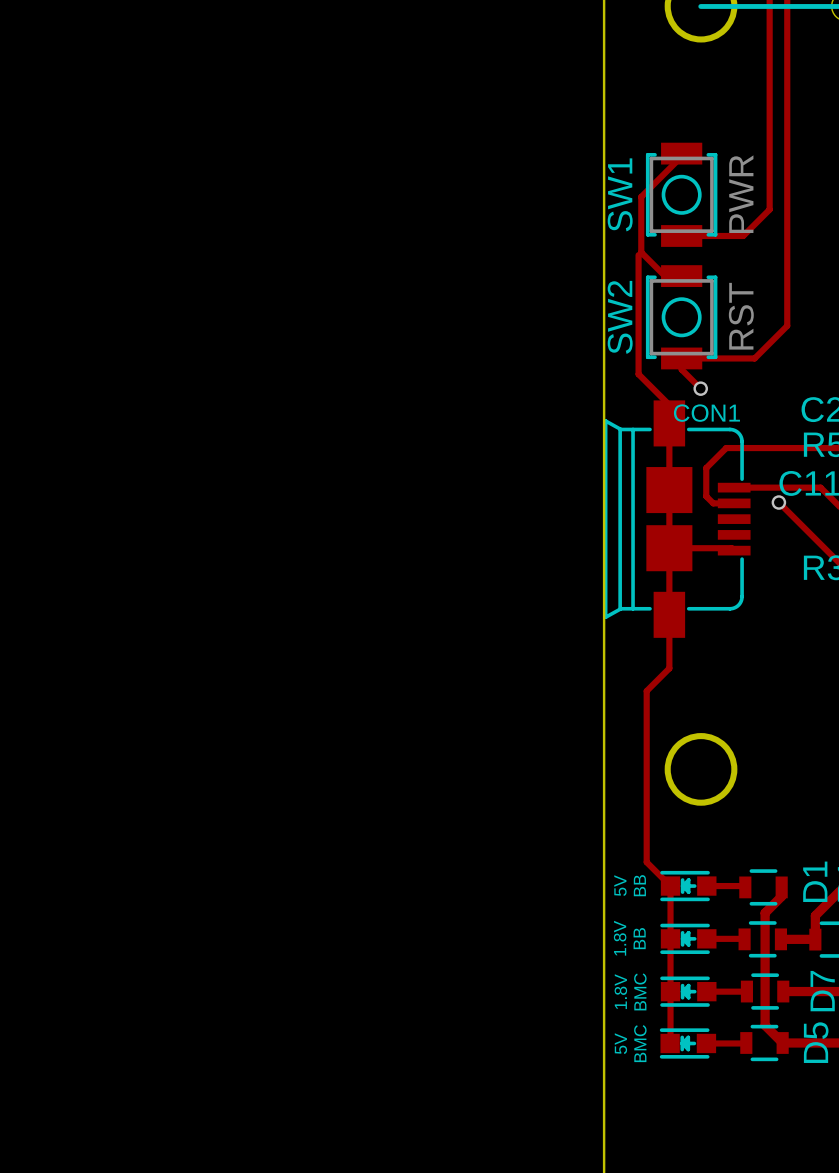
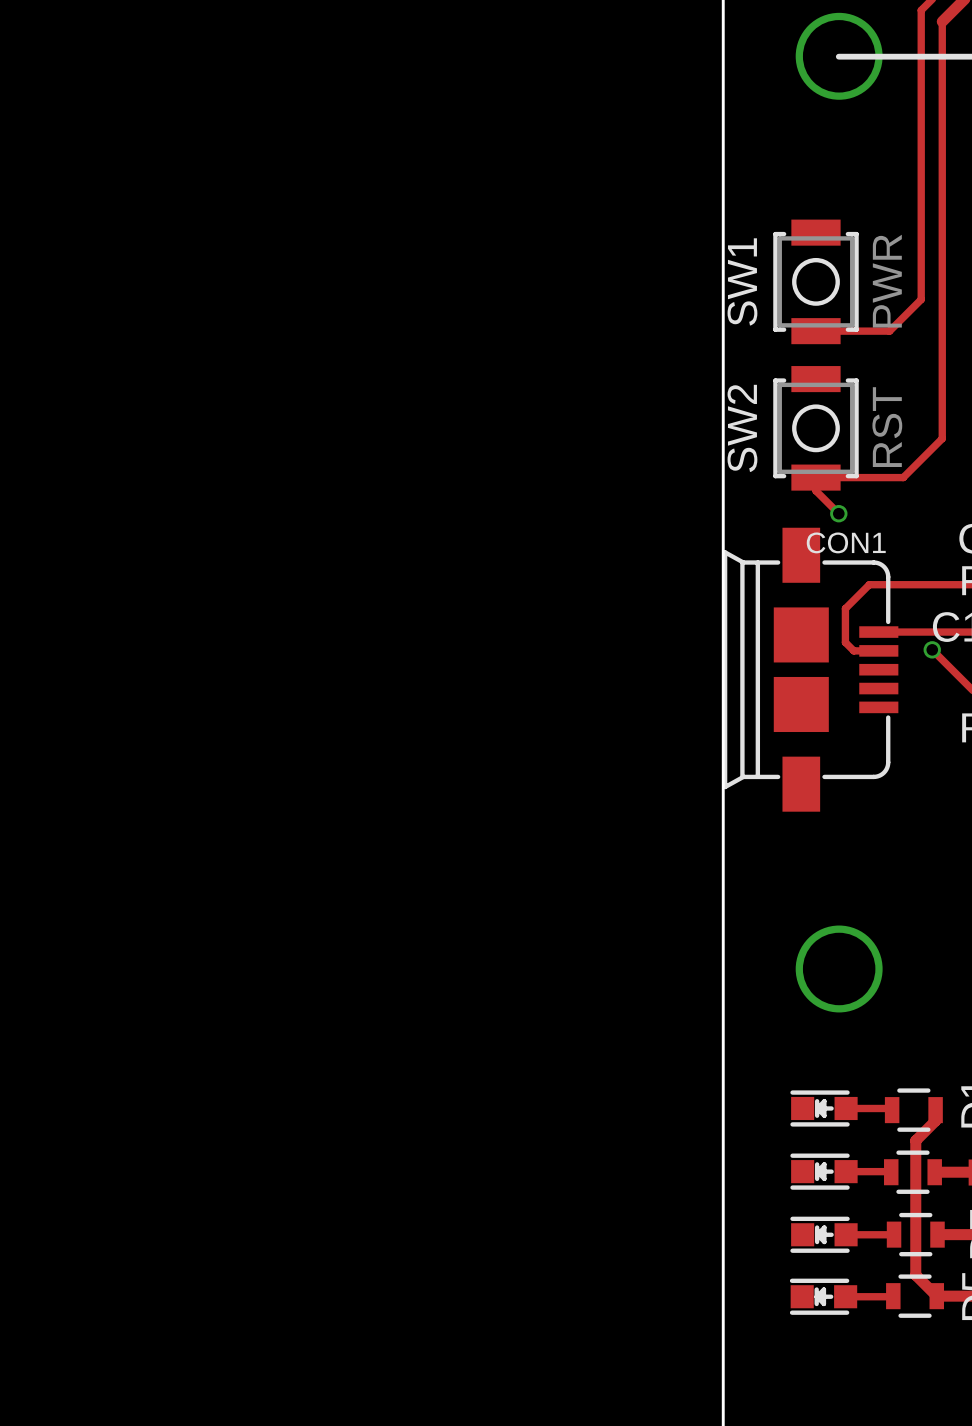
track: (681, 153) (681, 156) (641, 196) (641, 252) (664, 276) (681, 276) -> none
track: (638, 255) (638, 374) (669, 405) (669, 668) (646, 691) (646, 862) (670, 886) (670, 1043) -> none
track: (669, 548) (731, 548) (734, 550) -> none
text: 5V (620, 885) -> none
text: BB (639, 885) -> none
text: 1.8V (620, 938) -> none
text: BB (639, 938) -> none
text: 1.8V (620, 991) -> none
text: BMC (640, 991) -> none
text: 5V (620, 1043) -> none
text: BMC (640, 1043) -> none

